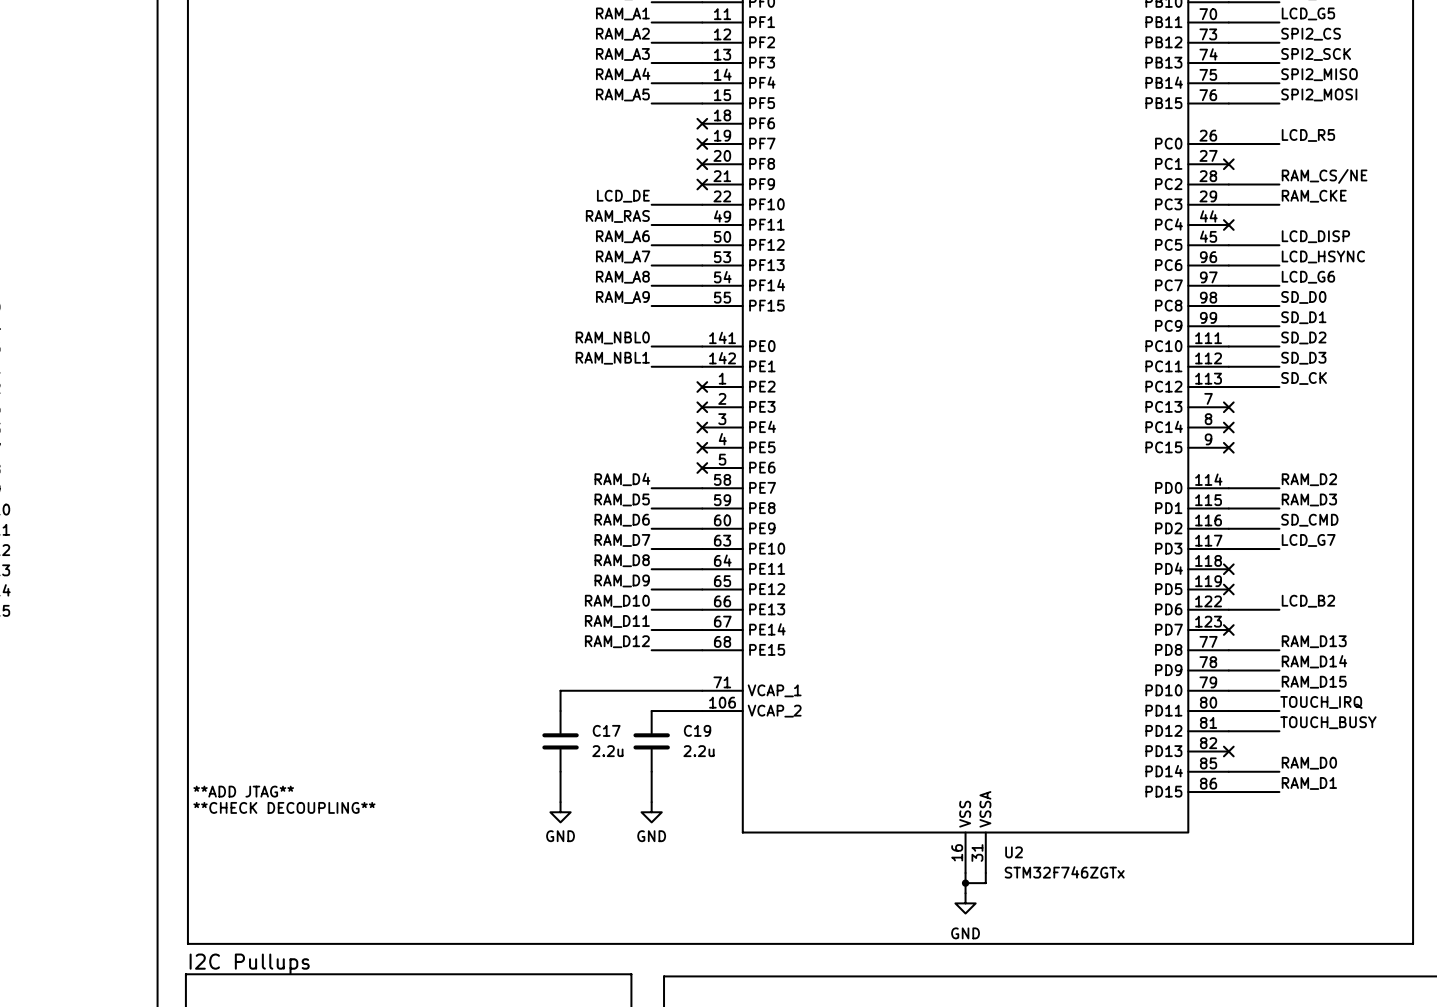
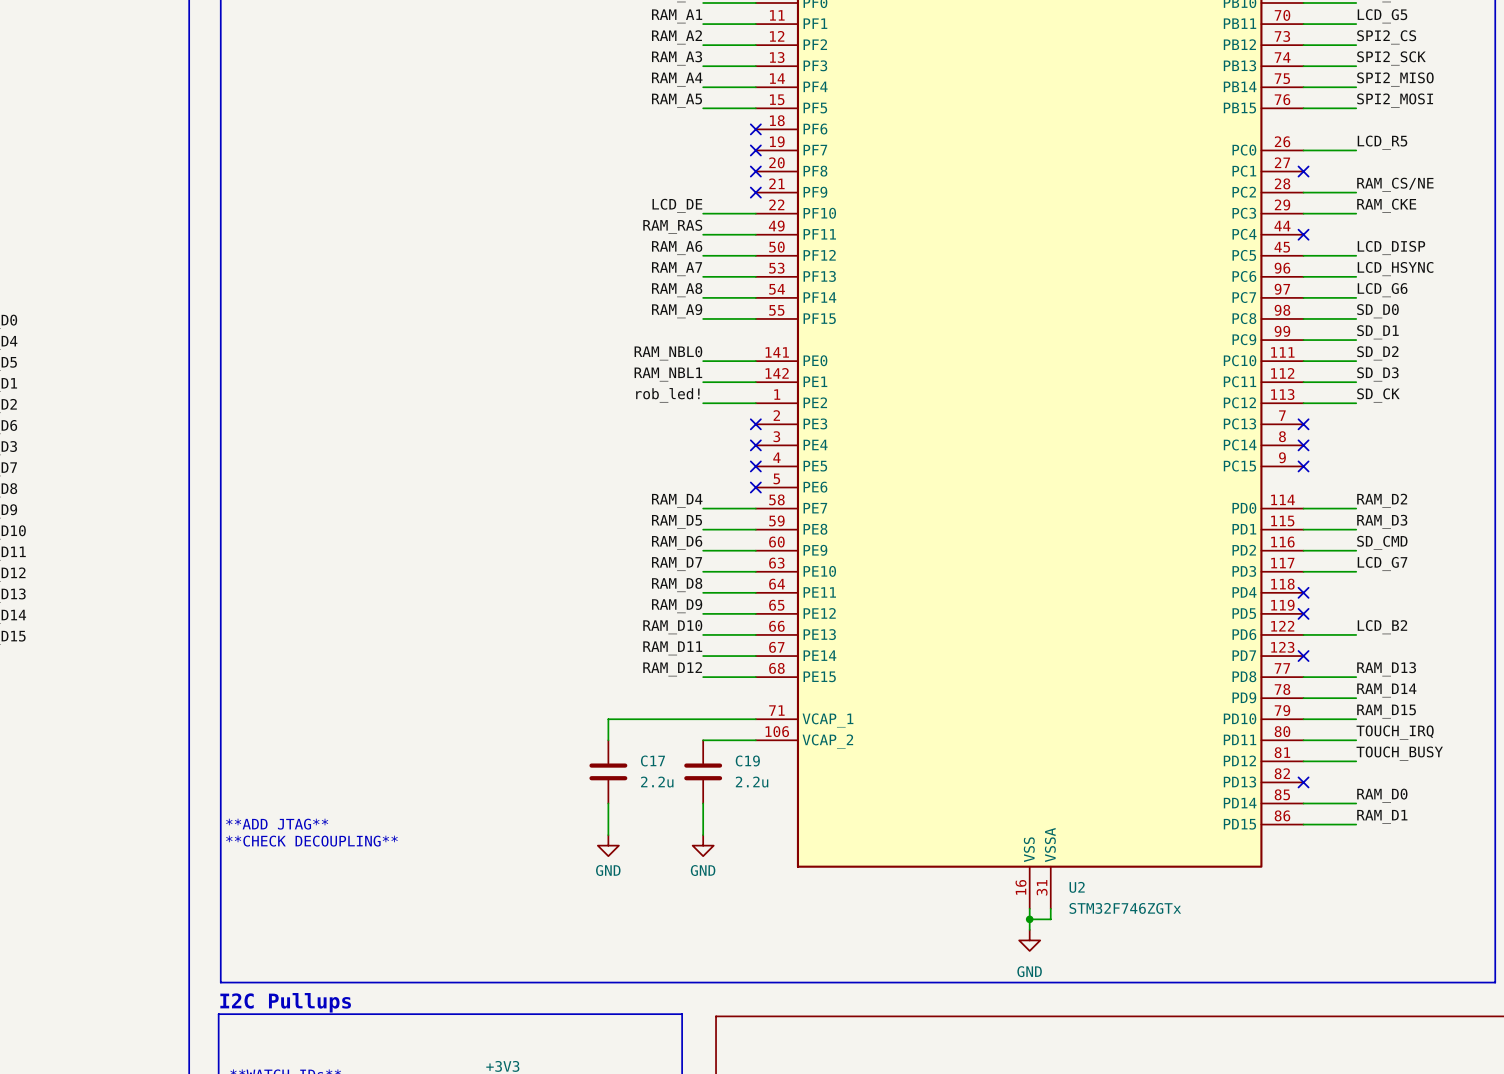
label: none -> rob_led! (667, 395)
wire: none -> (703, 403) (755, 403)
no-connect mark: (702, 387) -> none

